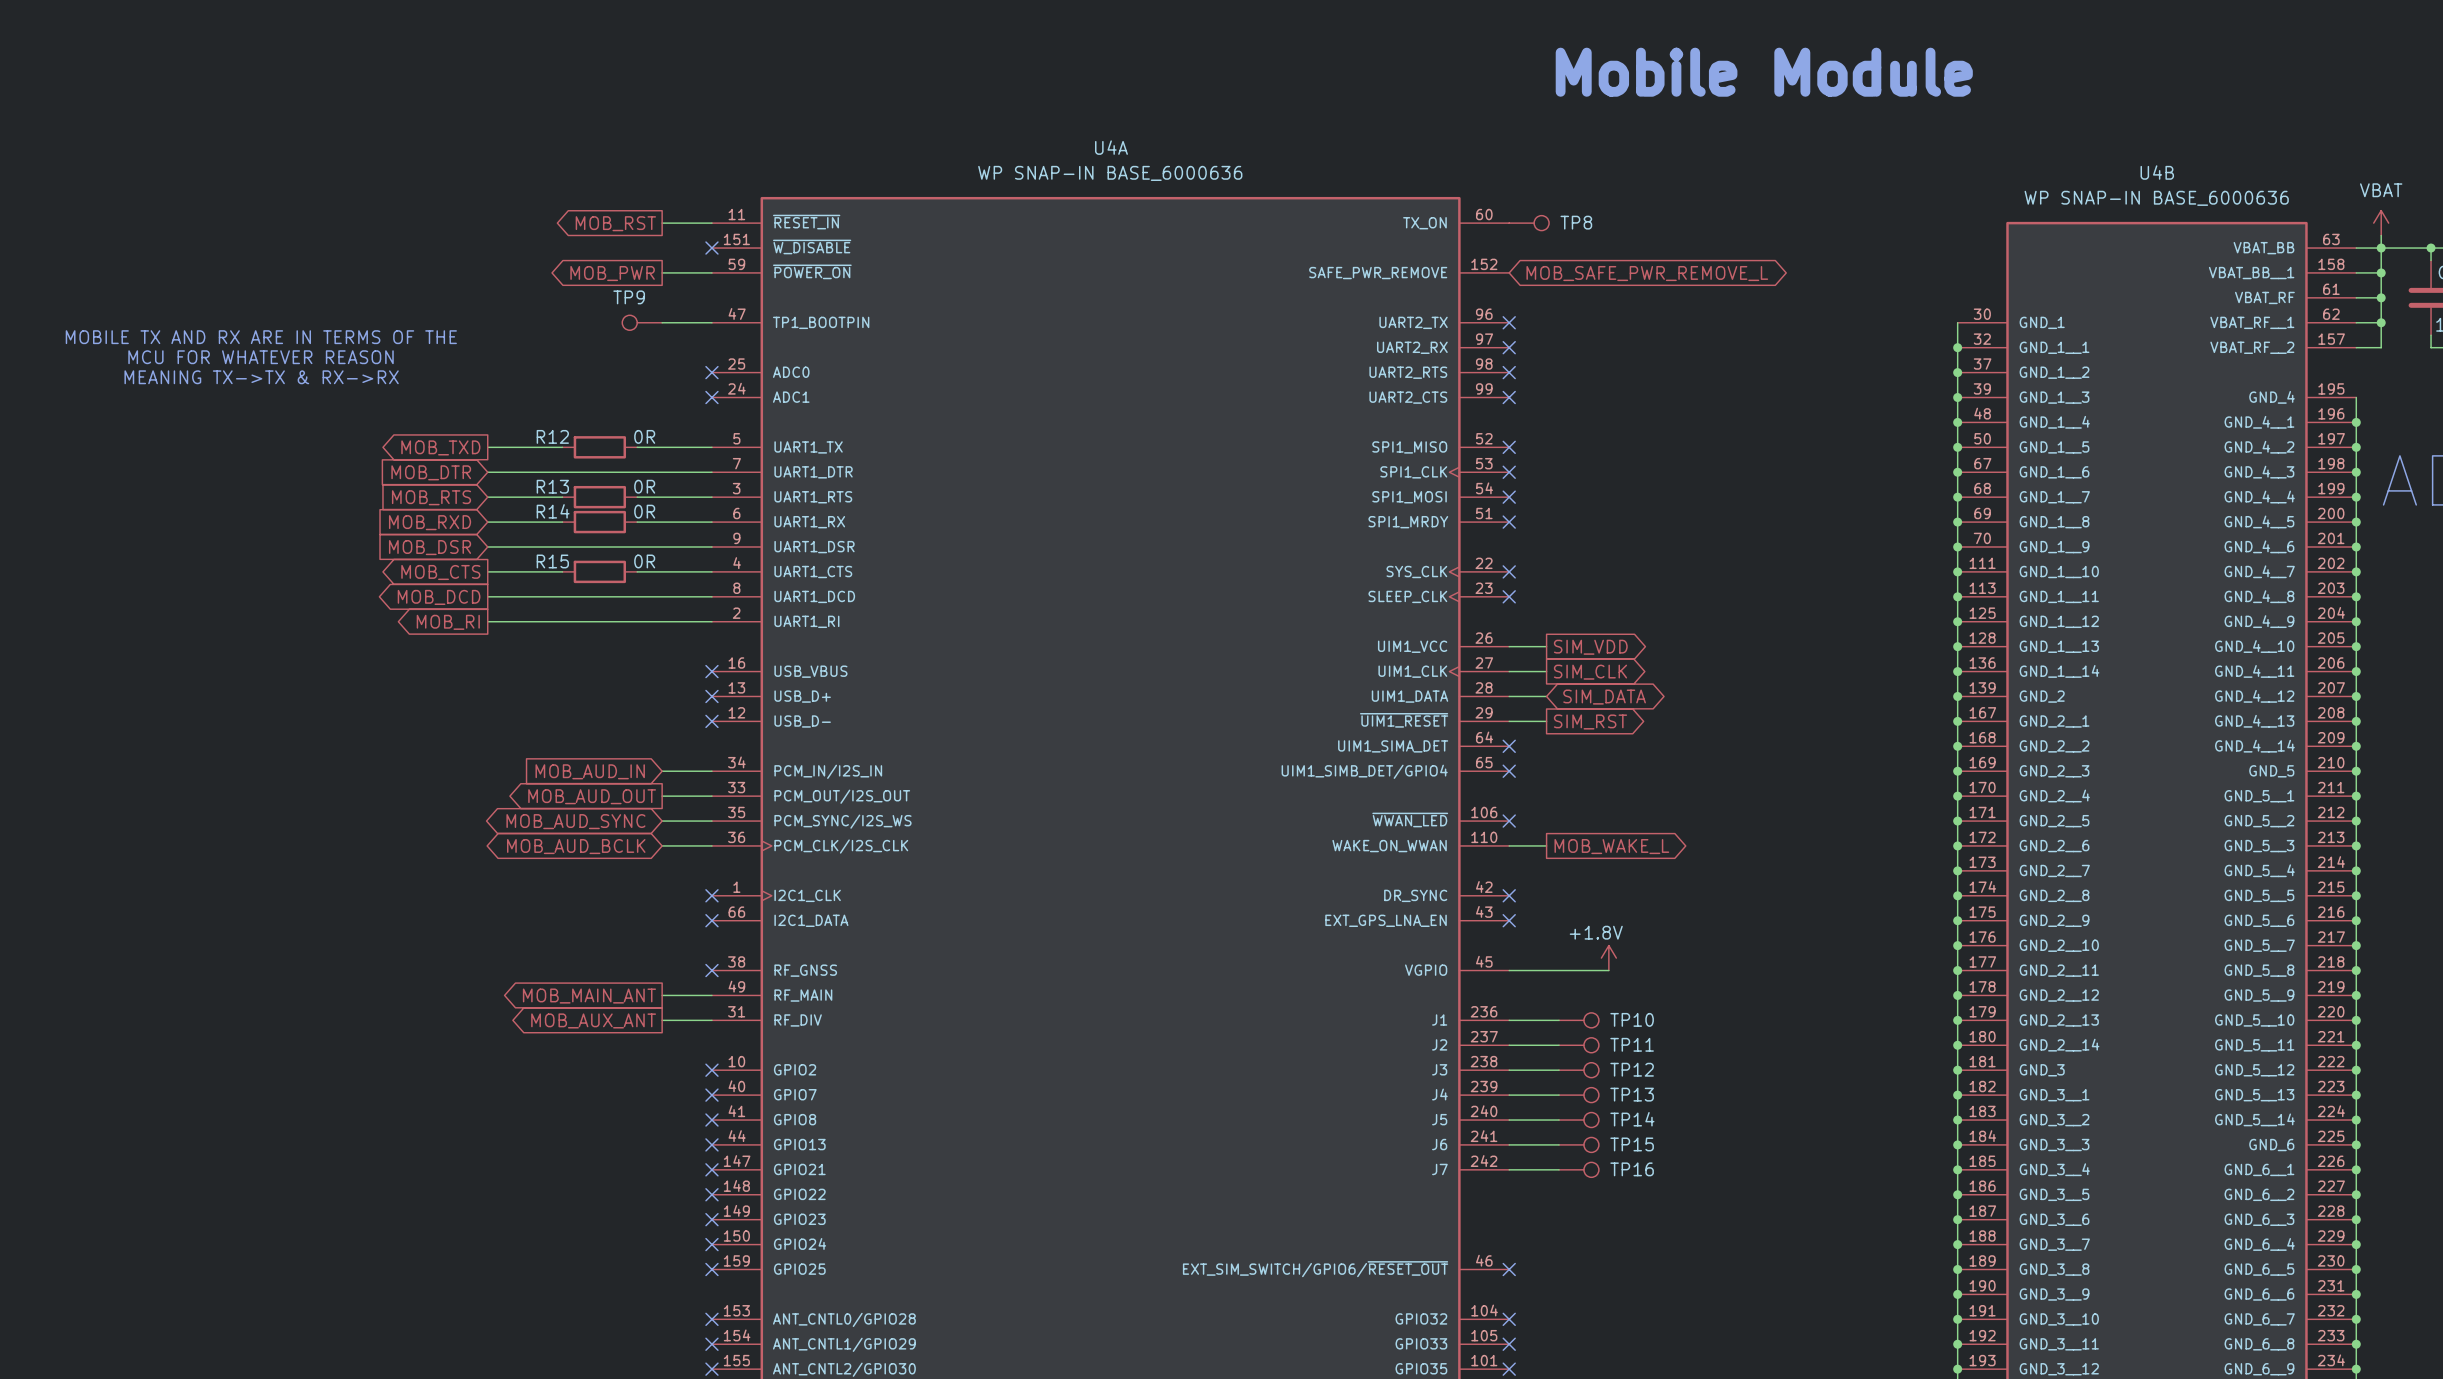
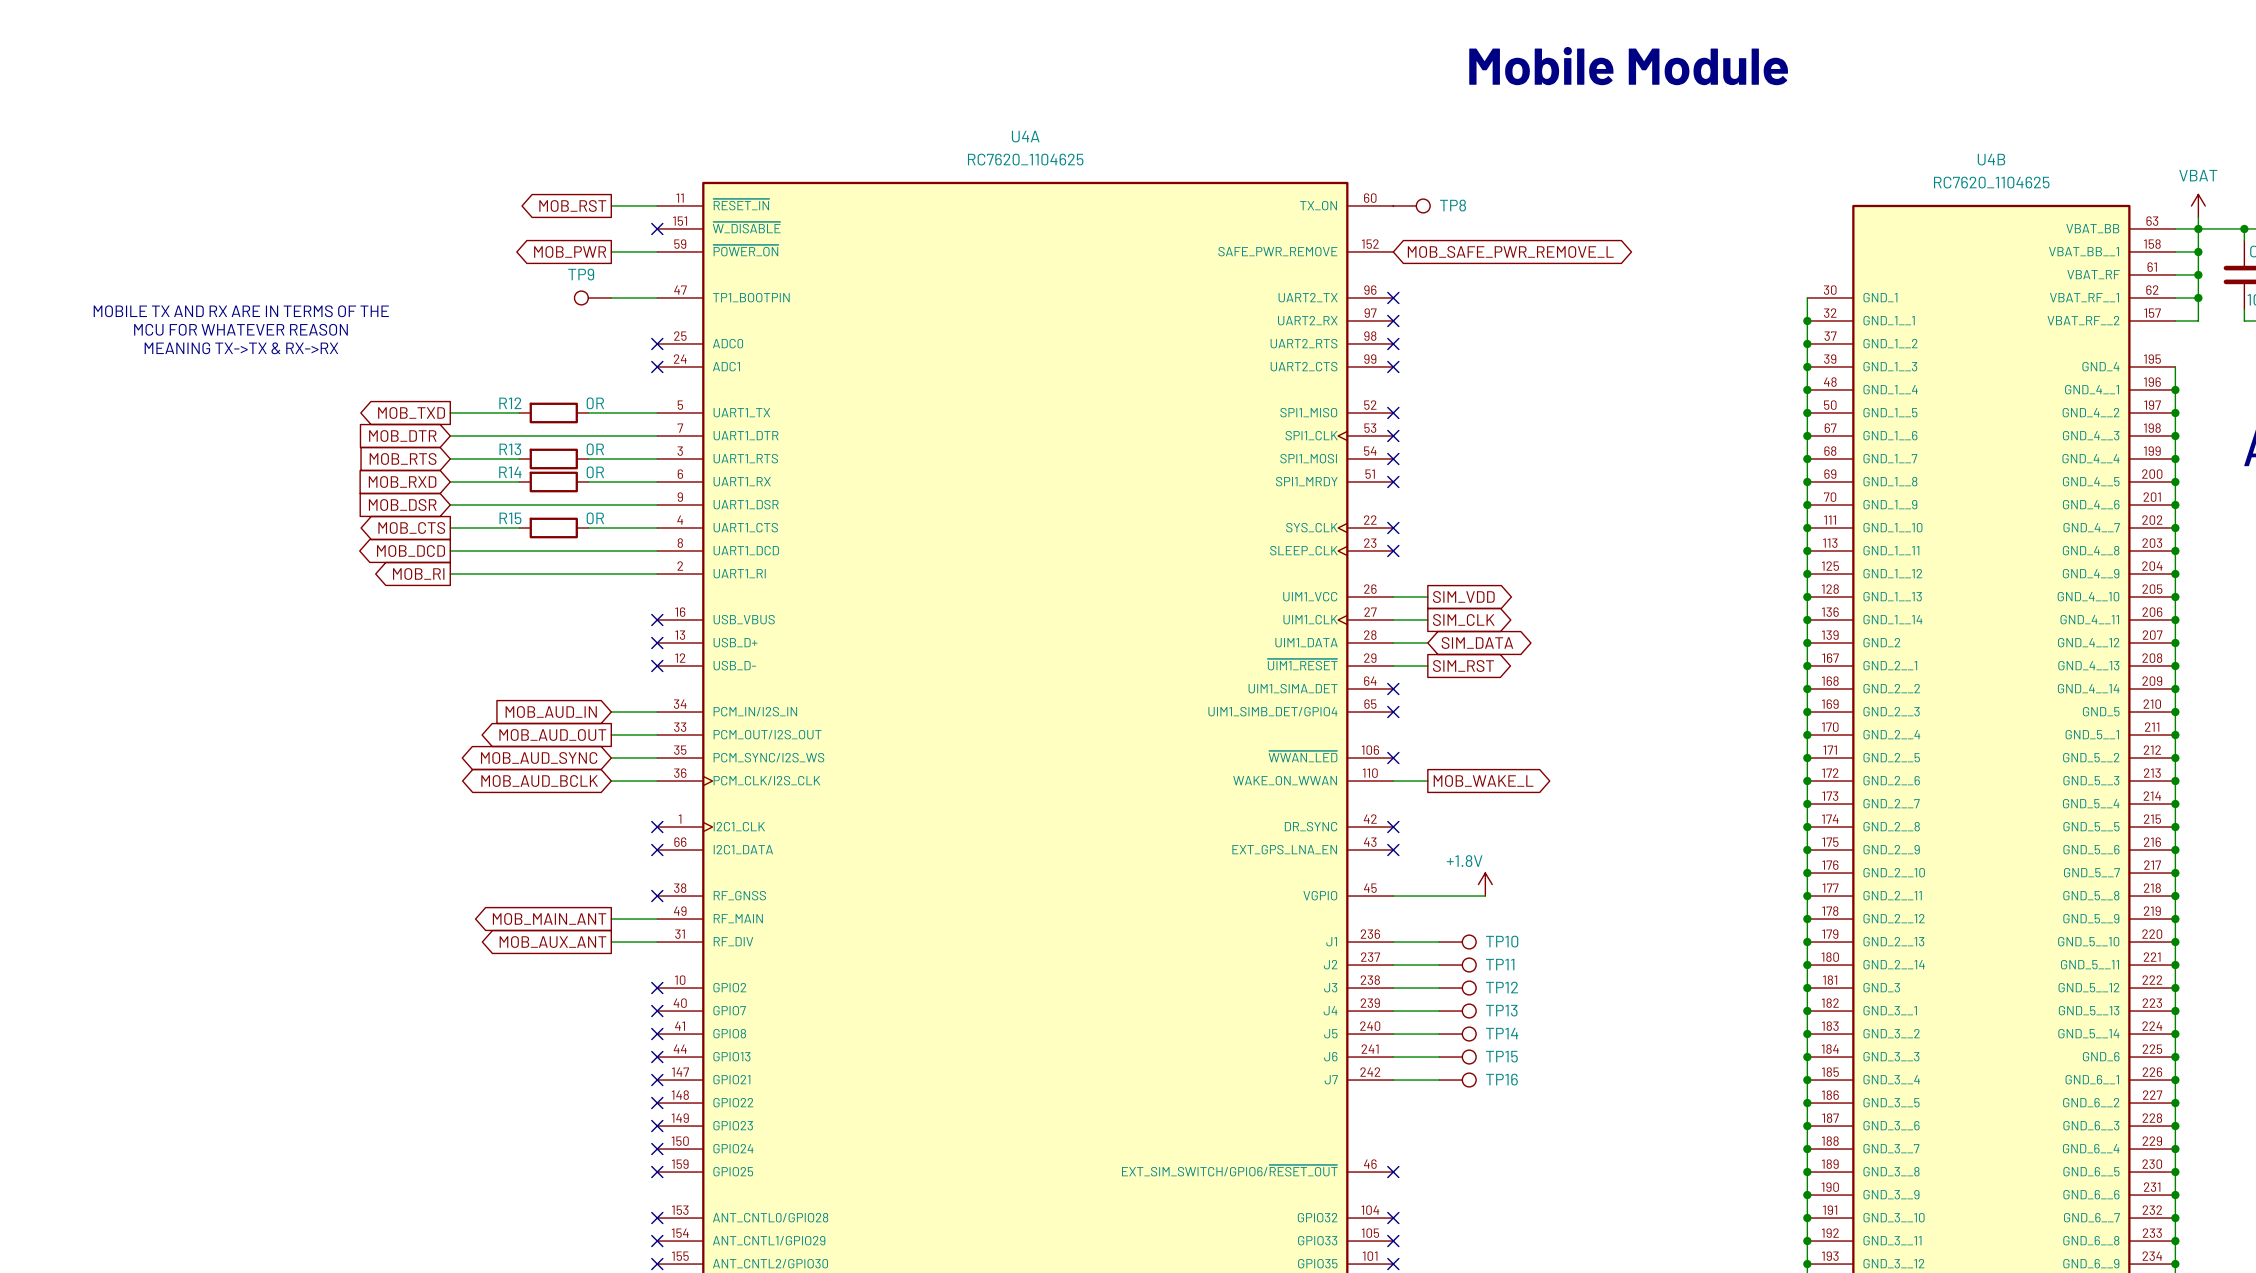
U4A value: WP SNAP-IN BASE_6000636 (1110, 173) -> RC7620_1104625 (1025, 159)
U4B value: WP SNAP-IN BASE_6000636 (2156, 198) -> RC7620_1104625 (1991, 182)

